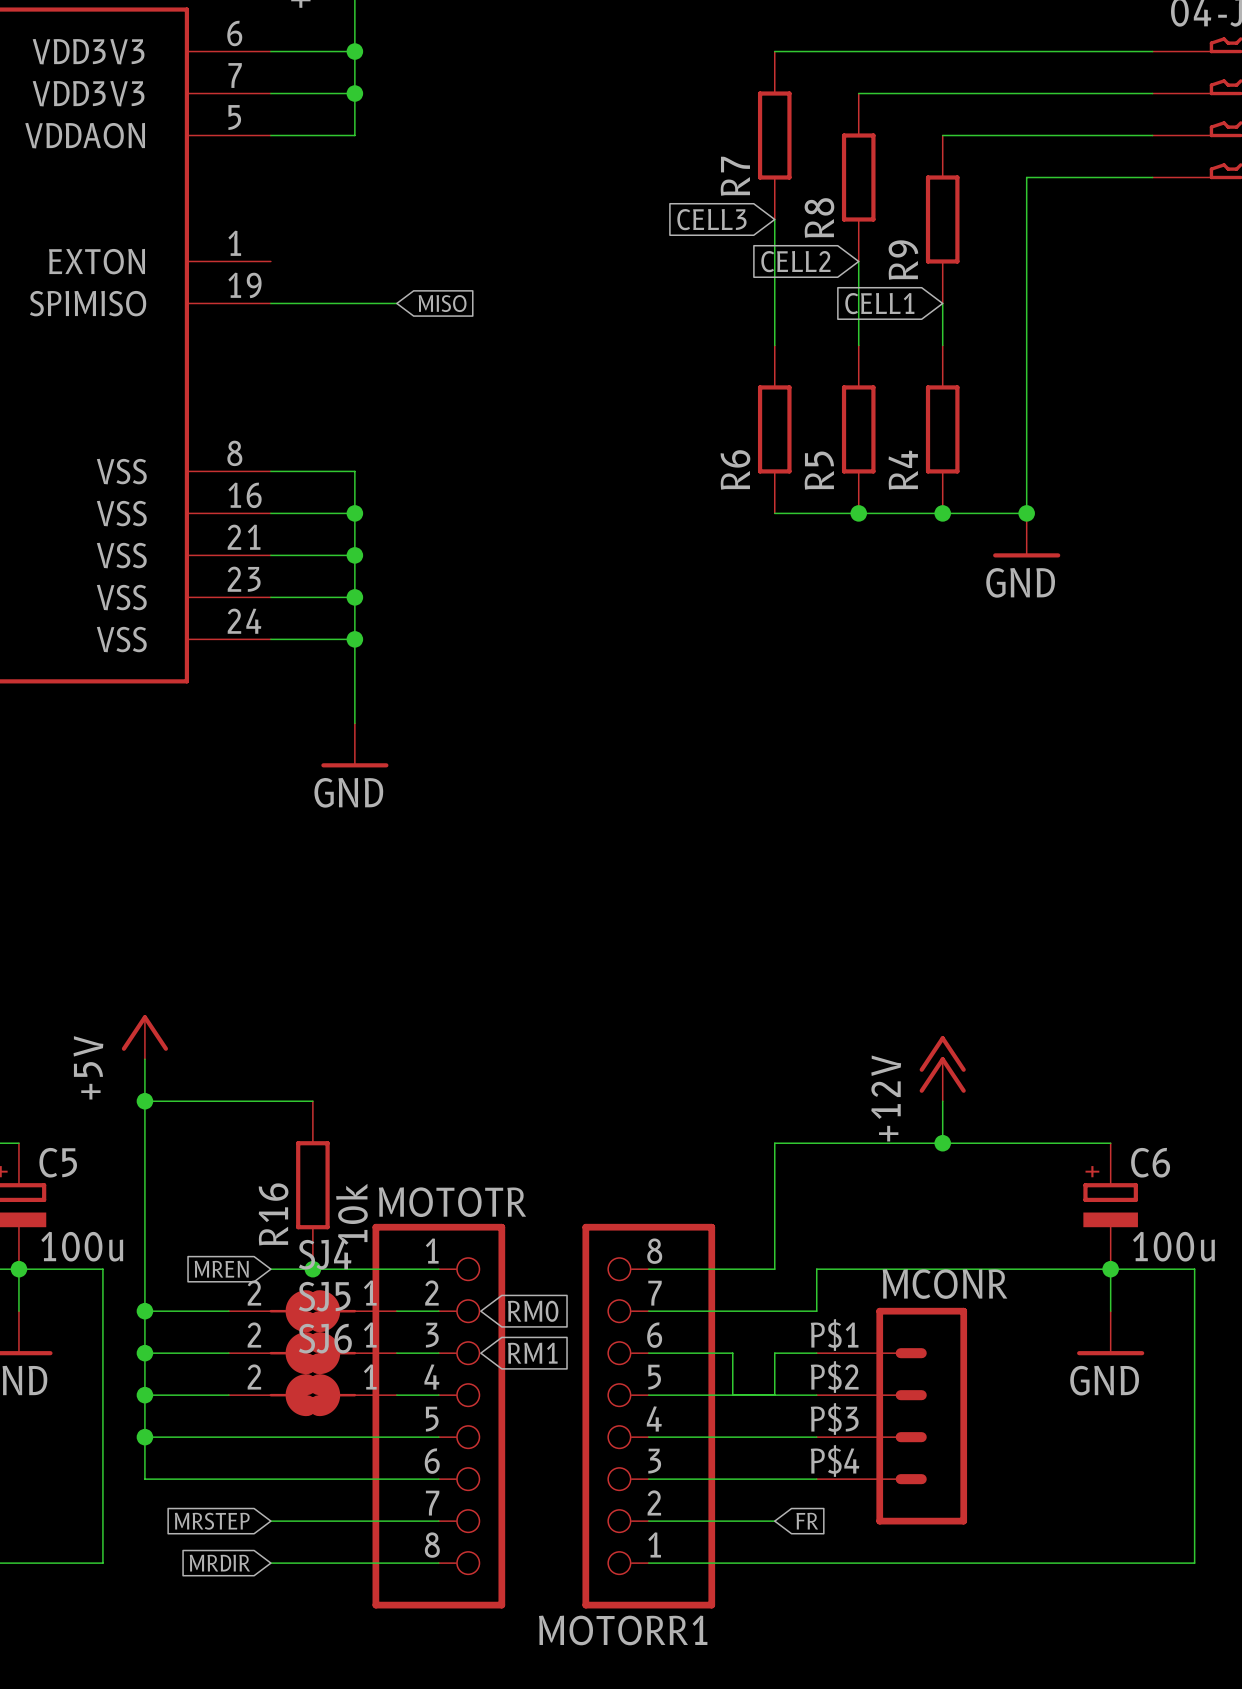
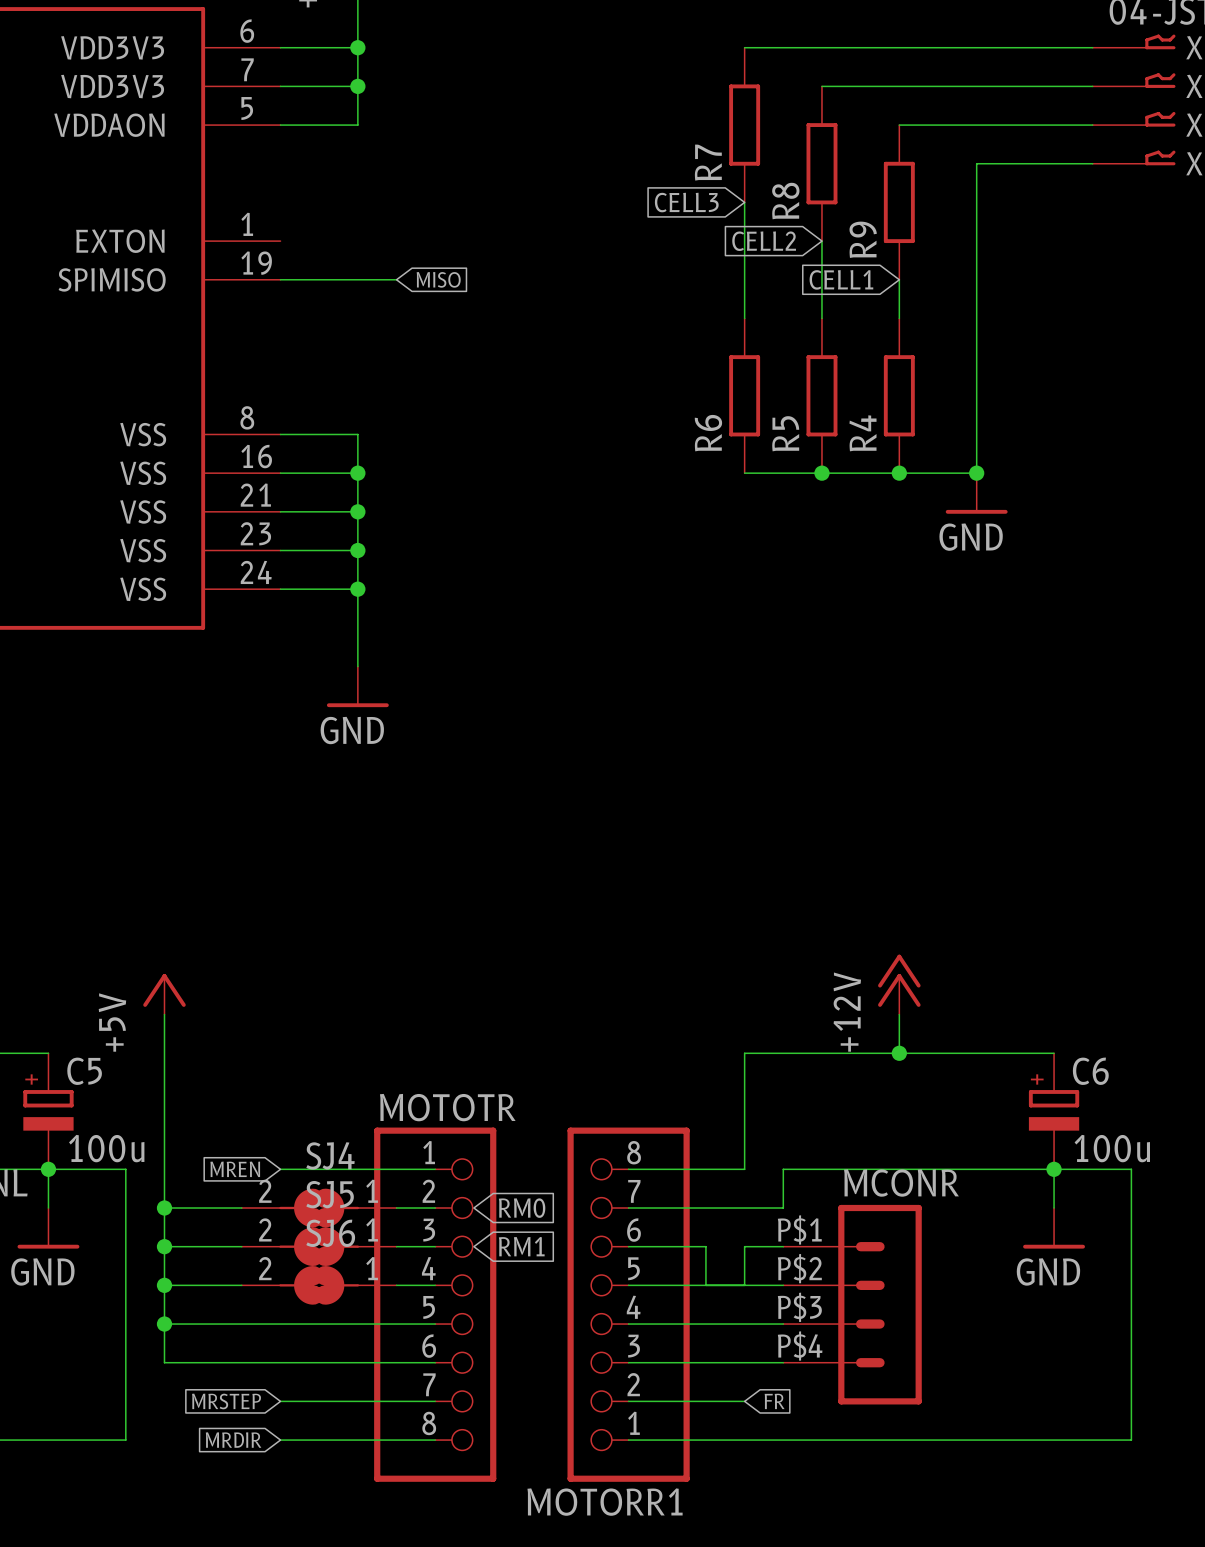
power symbol position: +5V (144, 1037) -> +5V (164, 994)
wire: (144, 1059) (144, 1101) (312, 1101) -> none
junction: (144, 1101) -> none
R16: 10k (312, 1185) -> none
junction: (312, 1269) -> none

